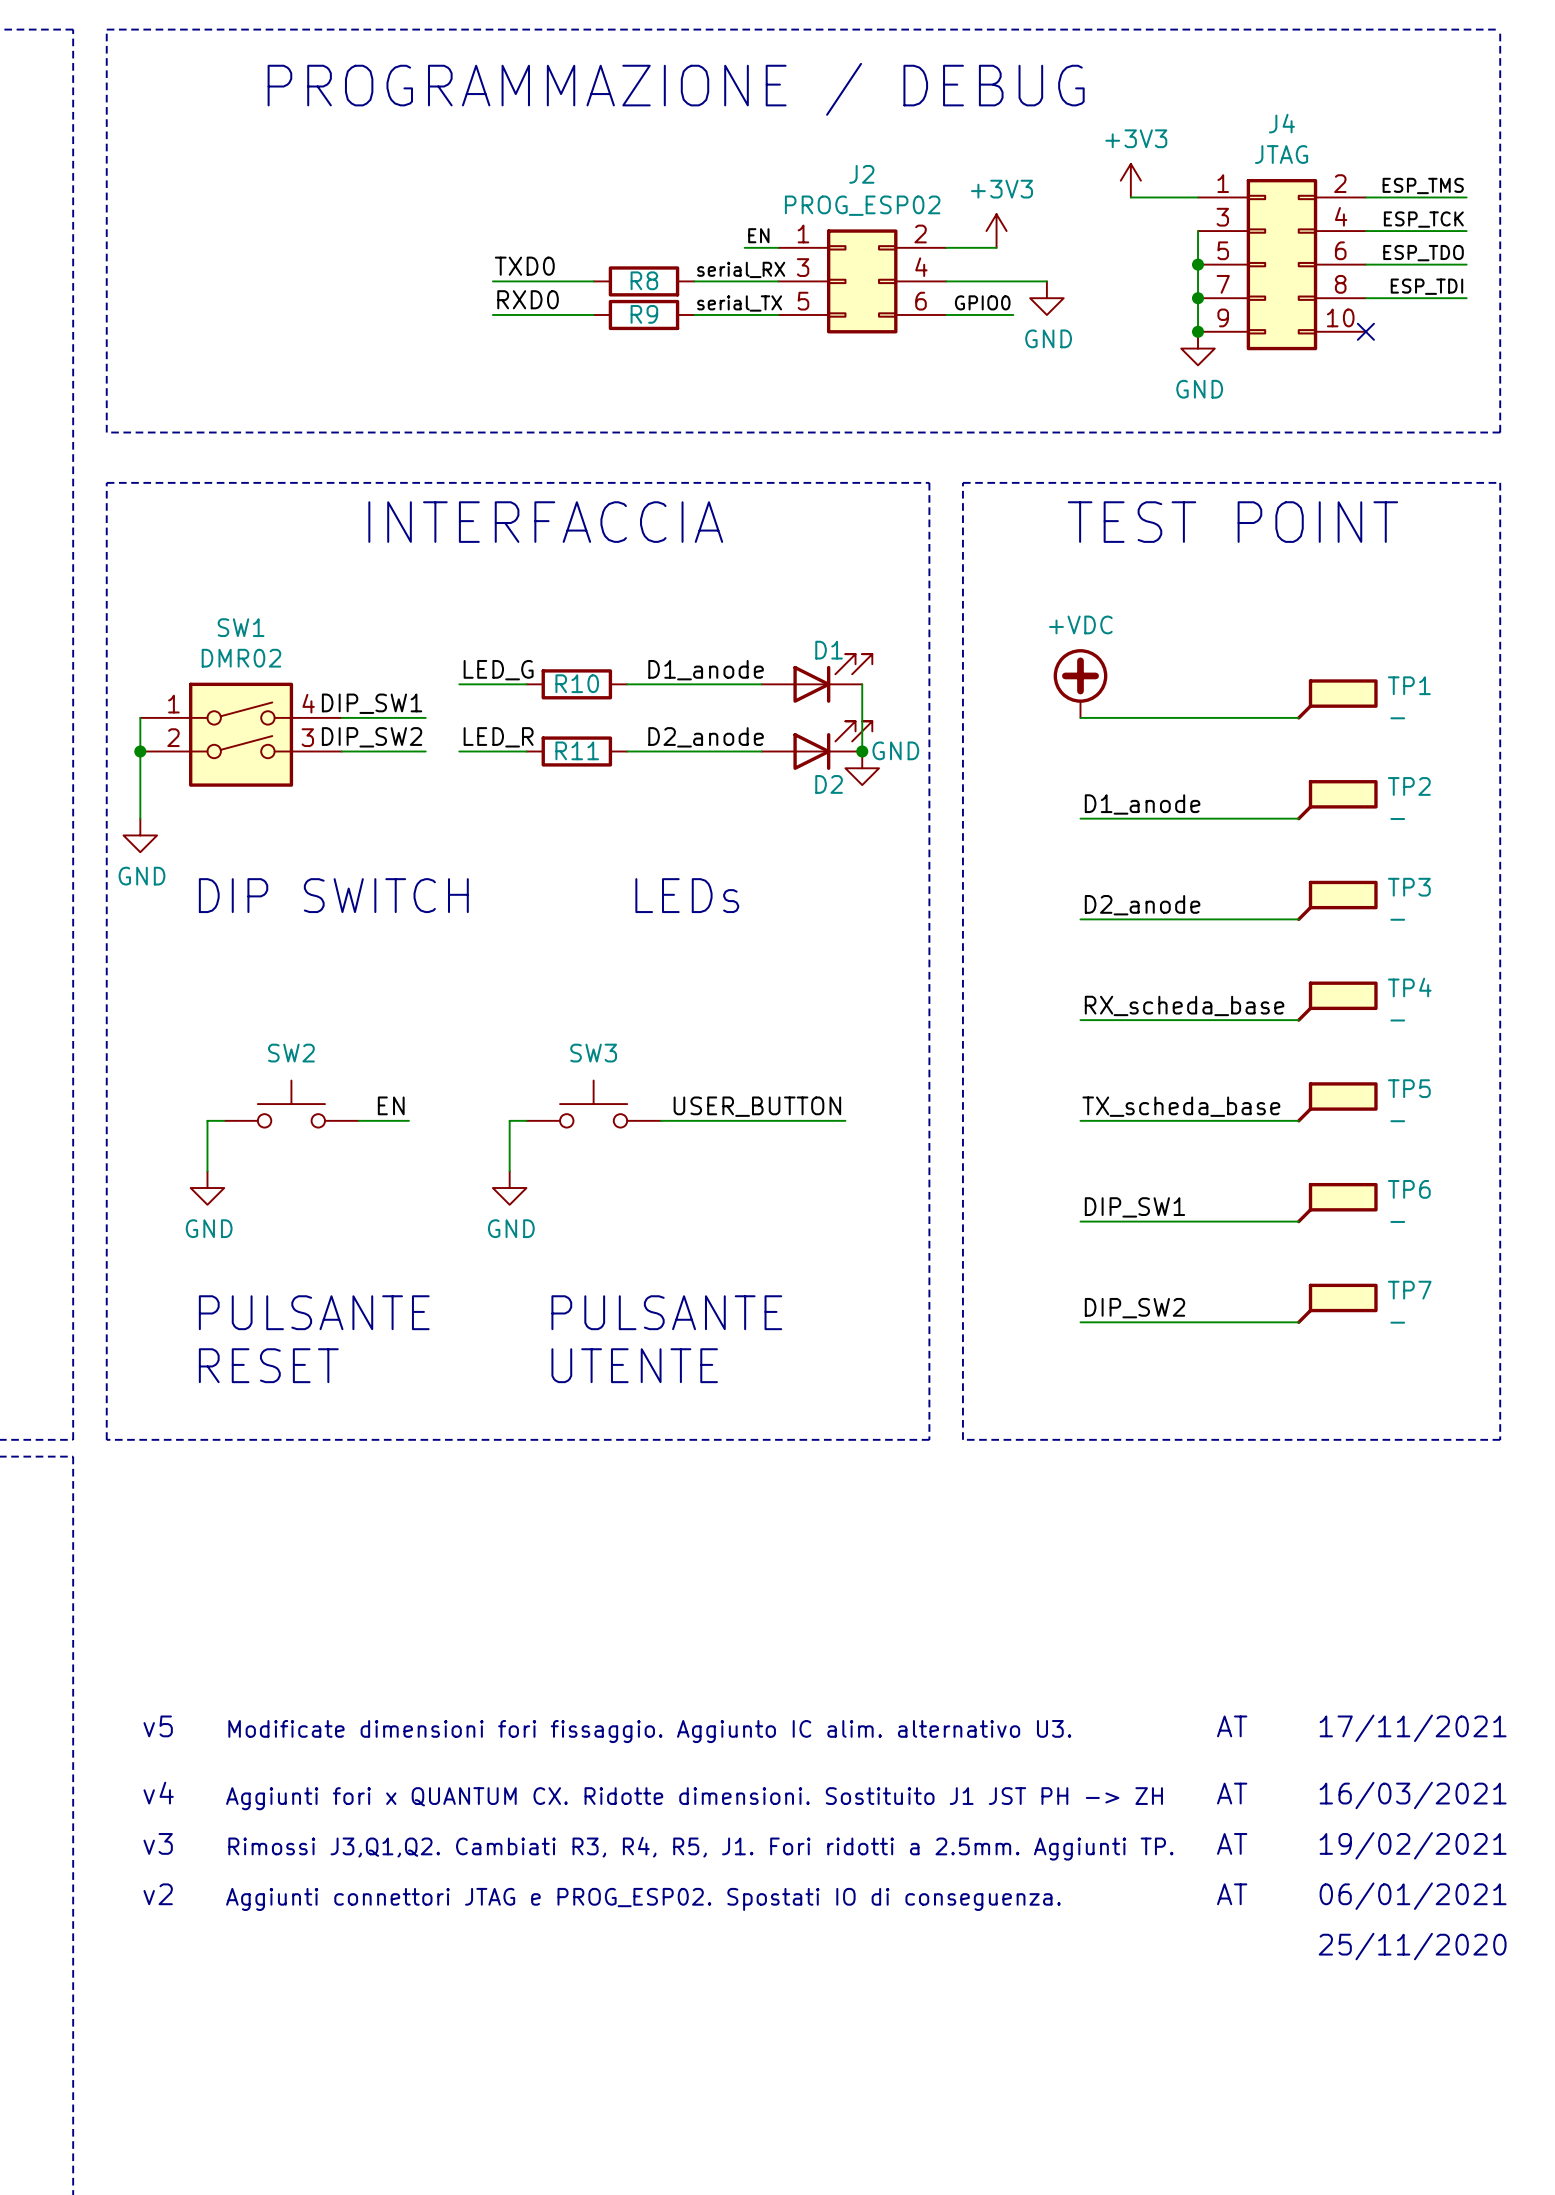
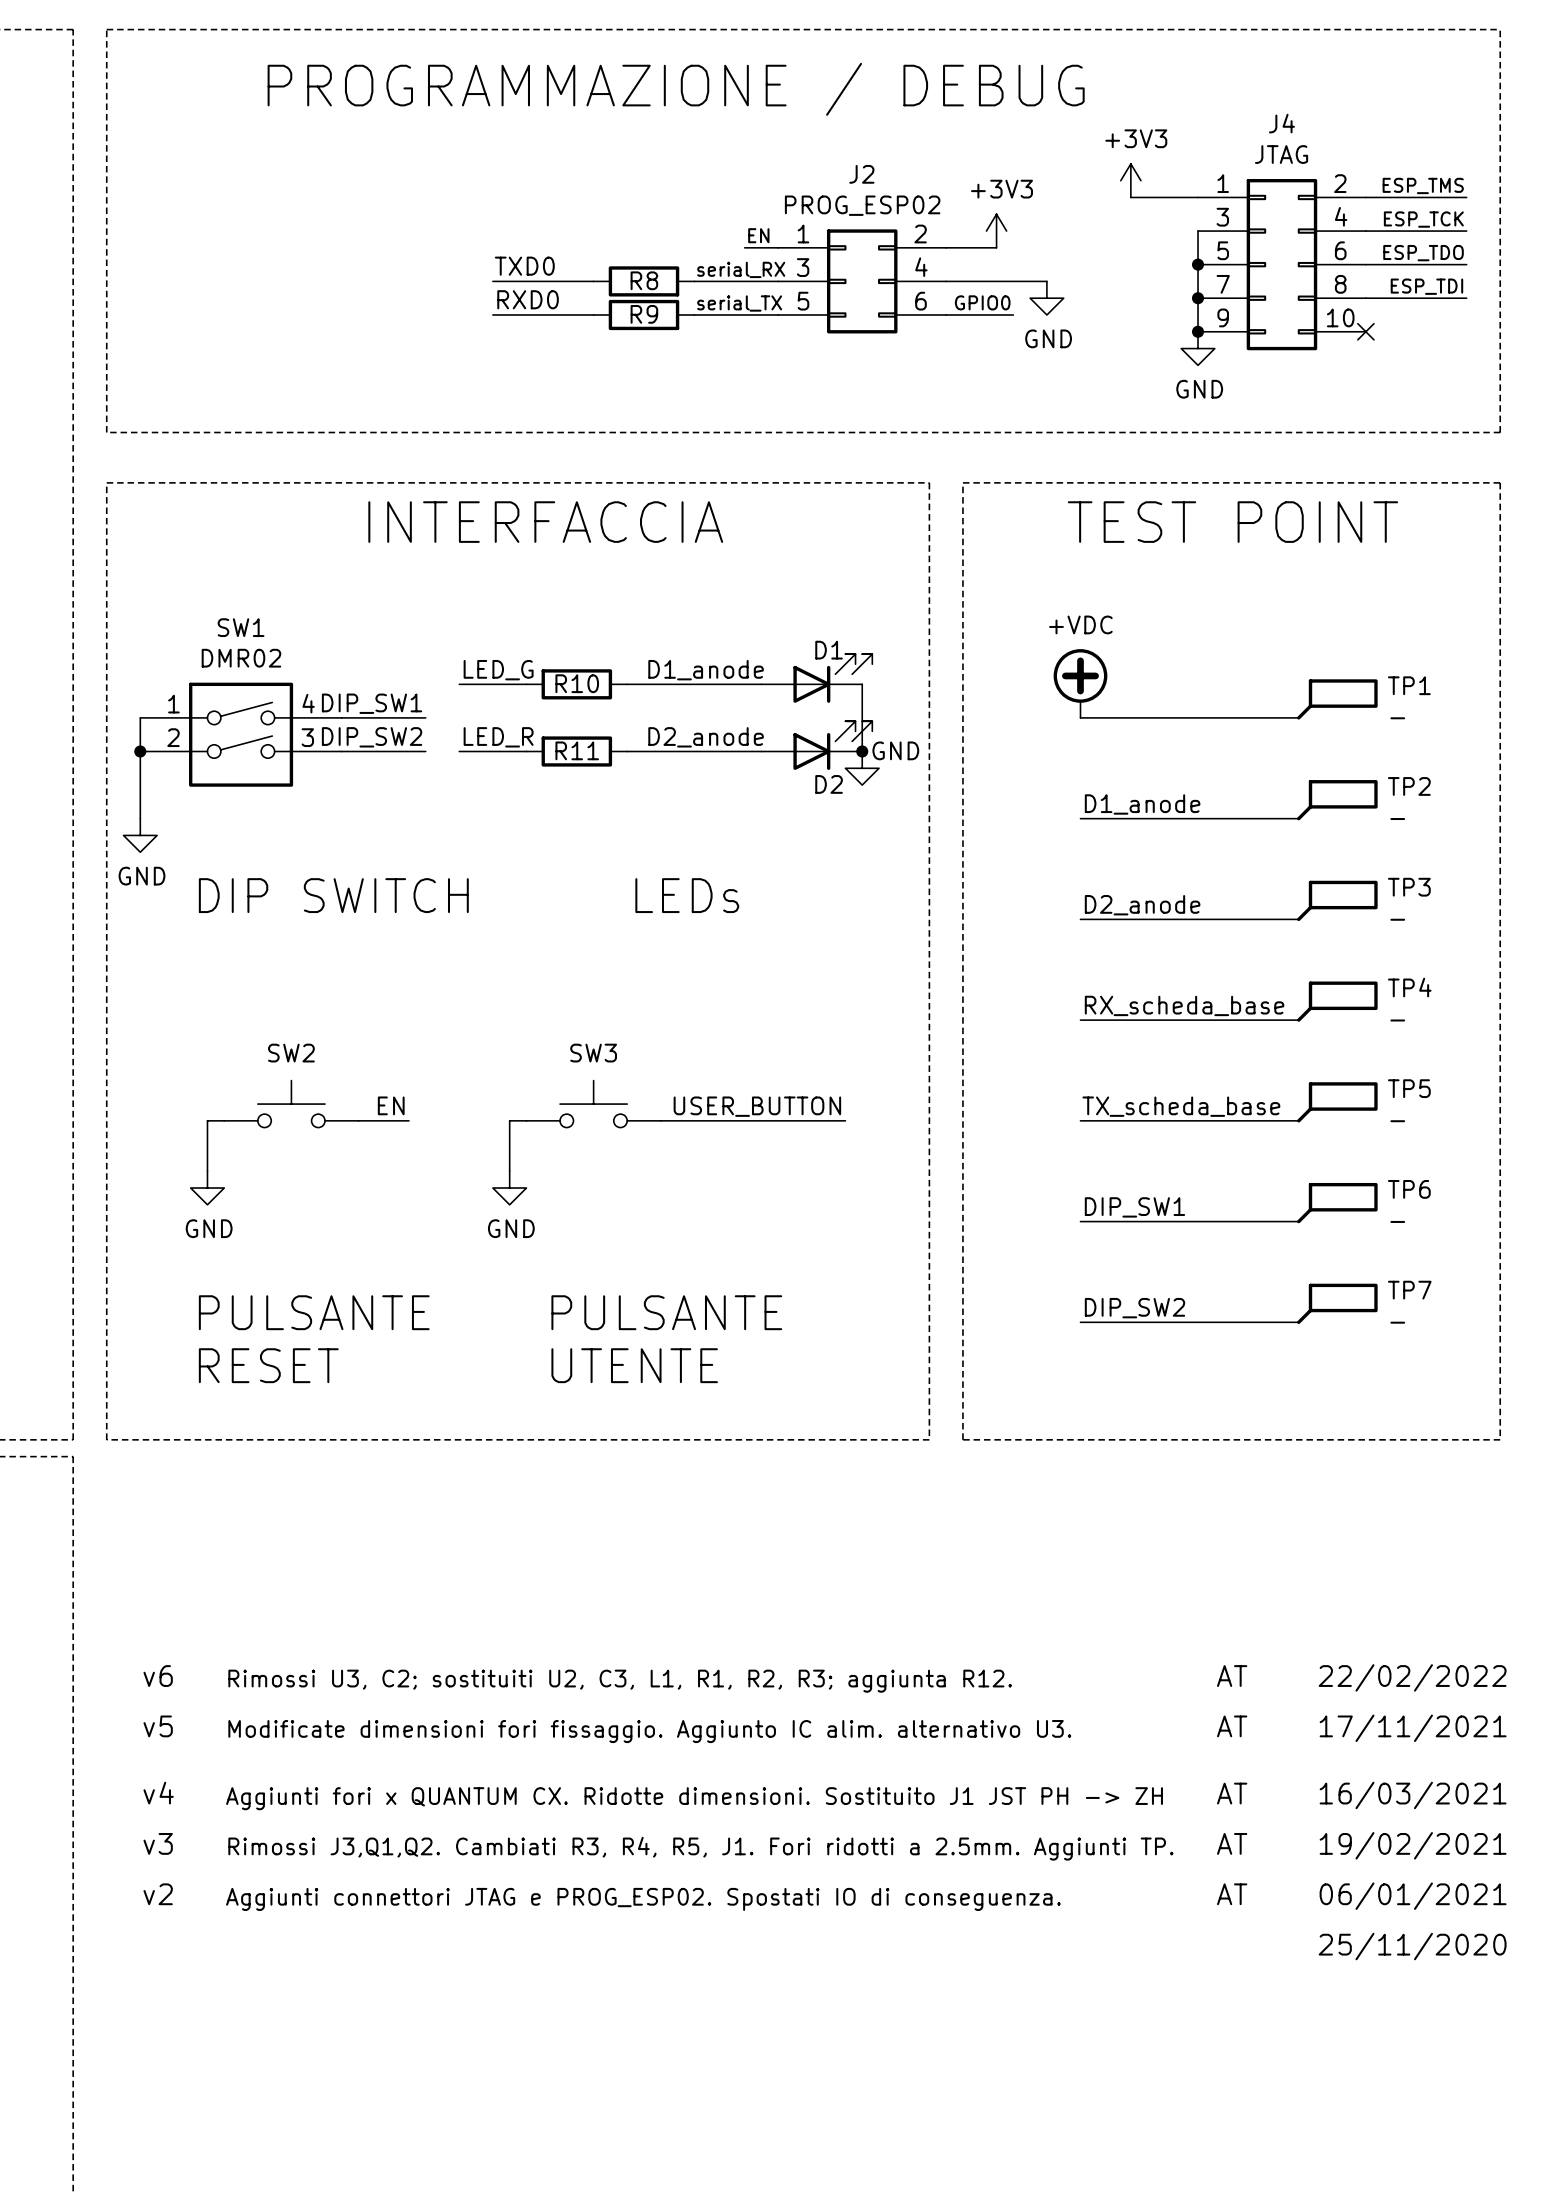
text: none -> v6 (158, 1676)
text: none -> AT (1232, 1676)
text: none -> 22/02/2022 (1412, 1677)
text: none -> Rimossi U3, C2; sostituiti U2, C3, L1, R1, R2, R3; aggiunta R12. (620, 1681)

